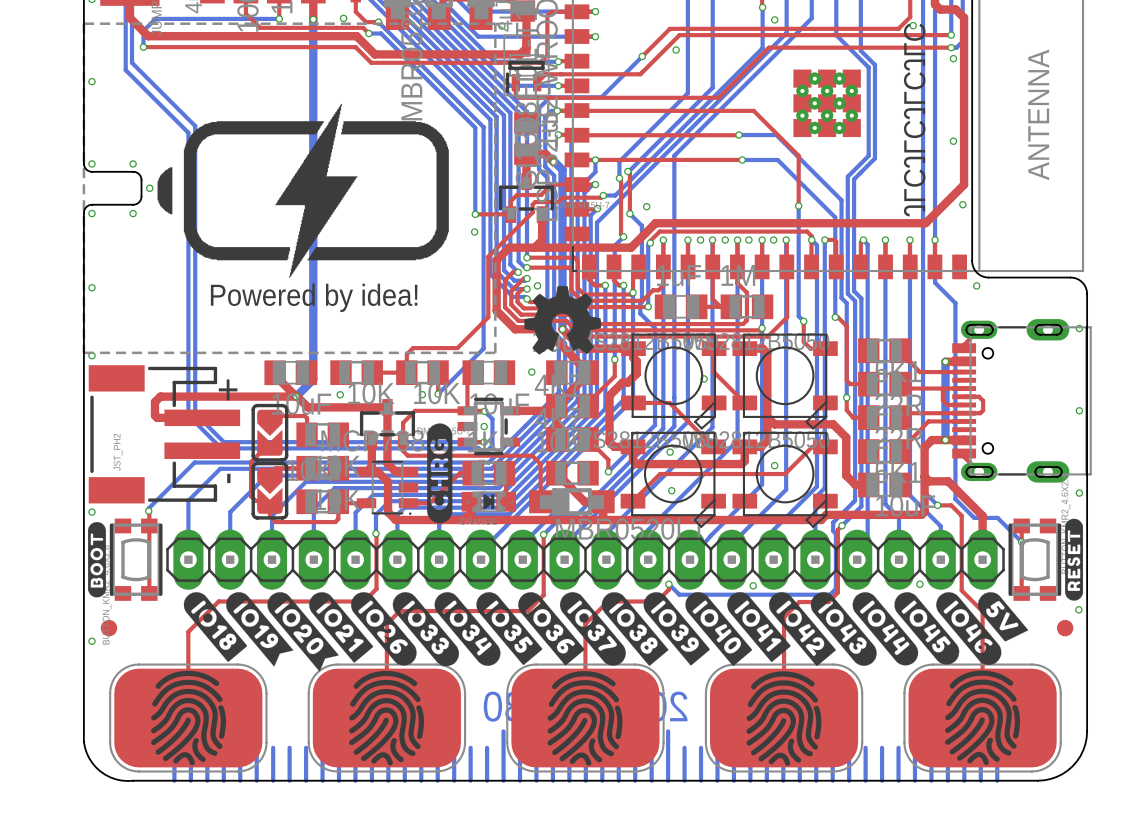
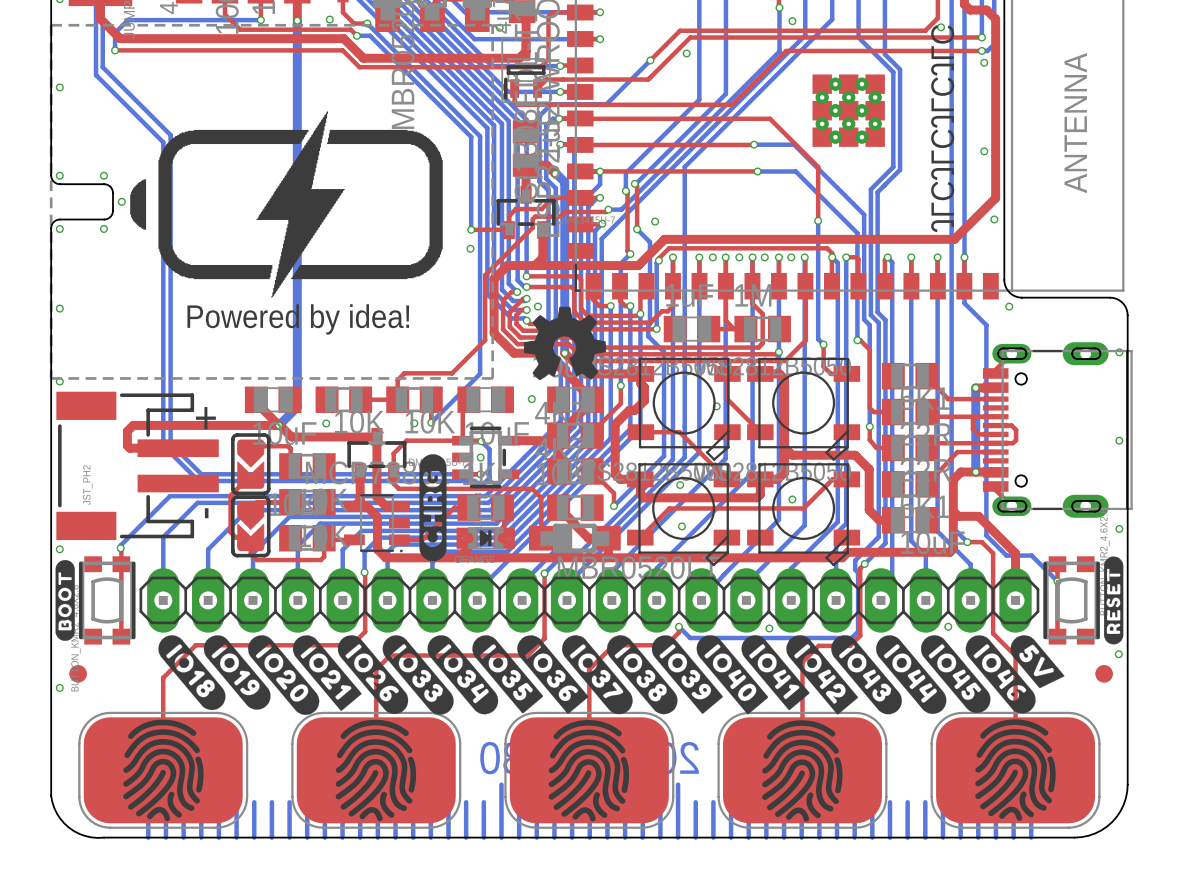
drawing shape: [183, 592, 248, 662] -> [158, 635, 226, 711]
drawing shape: [226, 592, 294, 667] -> [203, 635, 271, 710]
drawing shape: [267, 592, 339, 672] -> [248, 635, 320, 715]
drawing shape: [601, 592, 669, 666] -> [607, 635, 678, 715]

